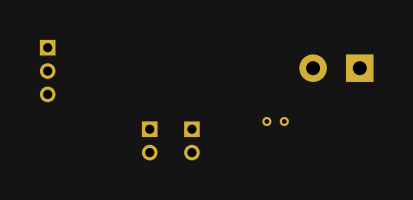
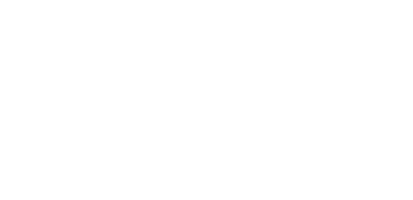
part: (336, 68) -> none
part: (47, 71) -> none
part: (275, 121) -> none
part: (149, 140) -> none
part: (191, 140) -> none

